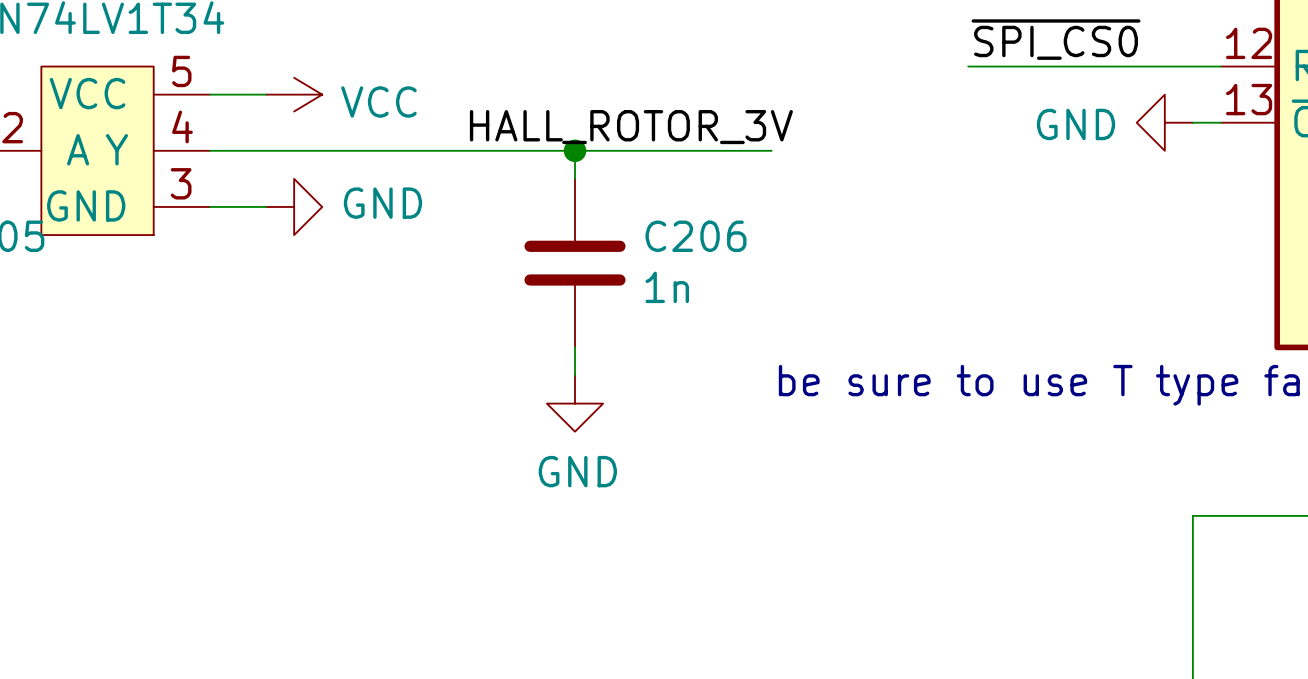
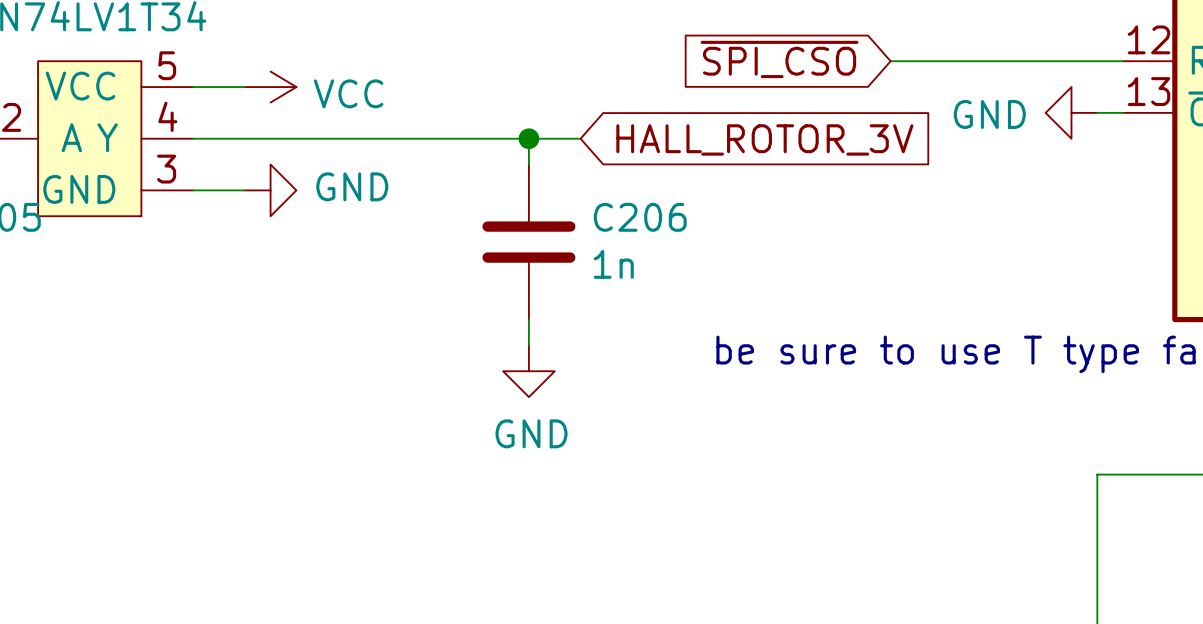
label: ~{SPI_CS0} (1056, 39) -> none
global label: none -> ~{SPI_CSO} (779, 59)
label: HALL_ROTOR_3V (631, 127) -> none
wire: (631, 150) (771, 150) -> none
global label: none -> HALL_ROTOR_3V (764, 139)

